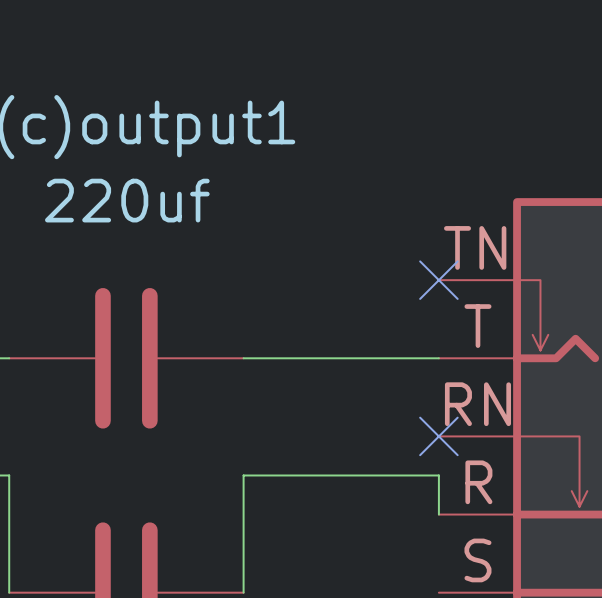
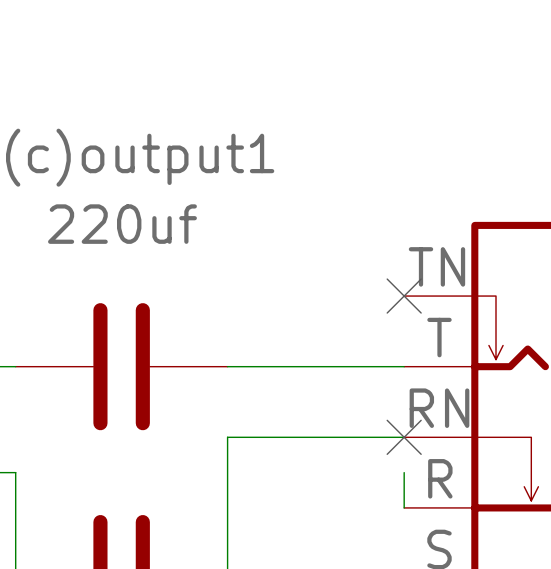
wire: (243, 475) (438, 475) -> (227, 472) (227, 437) (404, 437)

